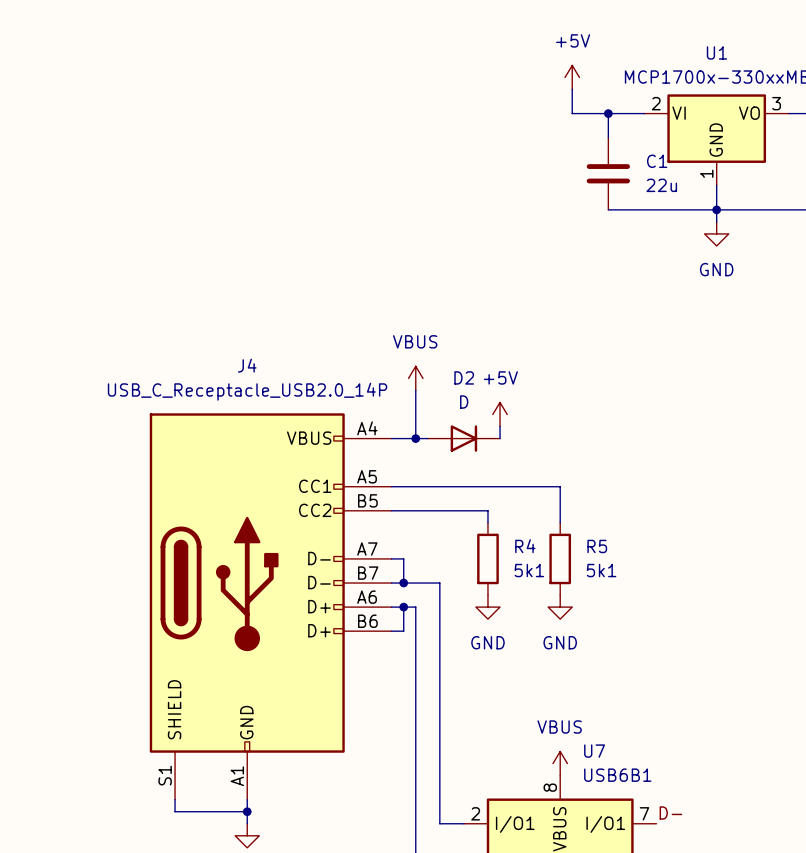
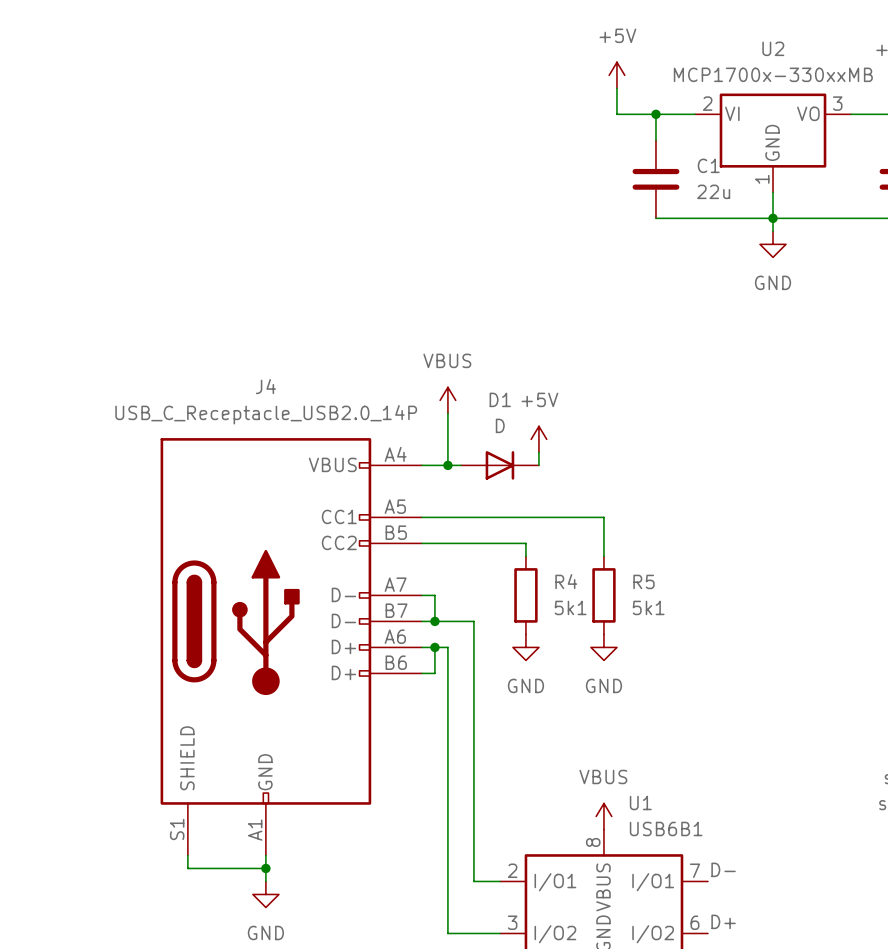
U1 name: U1 (716, 52) -> U2 (773, 48)
D2 name: D2 (464, 377) -> D1 (500, 399)
U7 name: U7 (594, 751) -> U1 (640, 802)

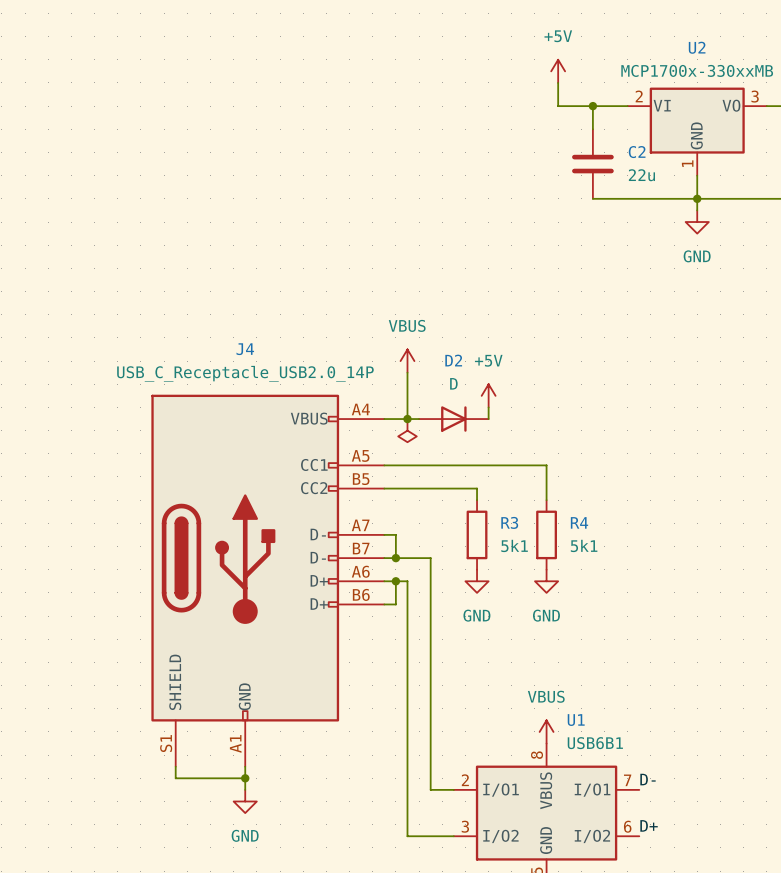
C1 name: C1 (708, 165) -> C2 (637, 152)
D1 name: D1 (500, 399) -> D2 (453, 360)
power symbol: none -> (407, 430)
R4 name: R4 (566, 581) -> R3 (509, 522)
R5 name: R5 (644, 581) -> R4 (579, 522)

